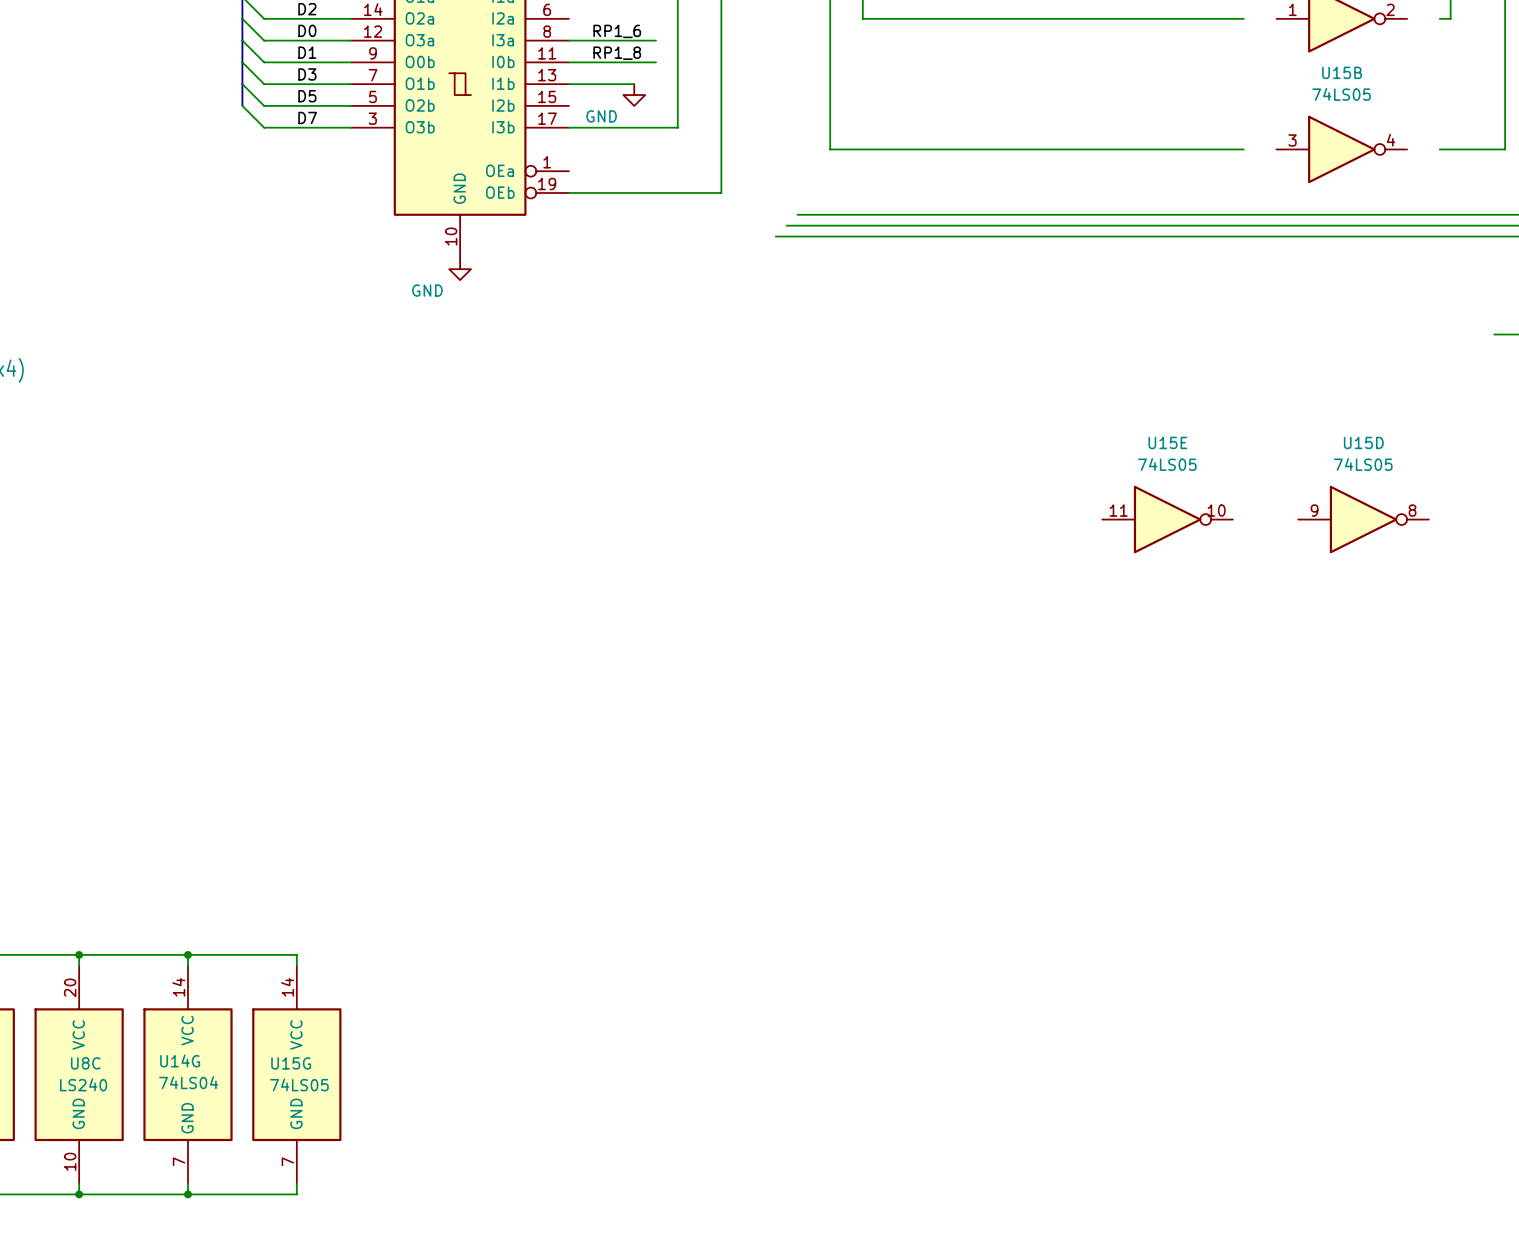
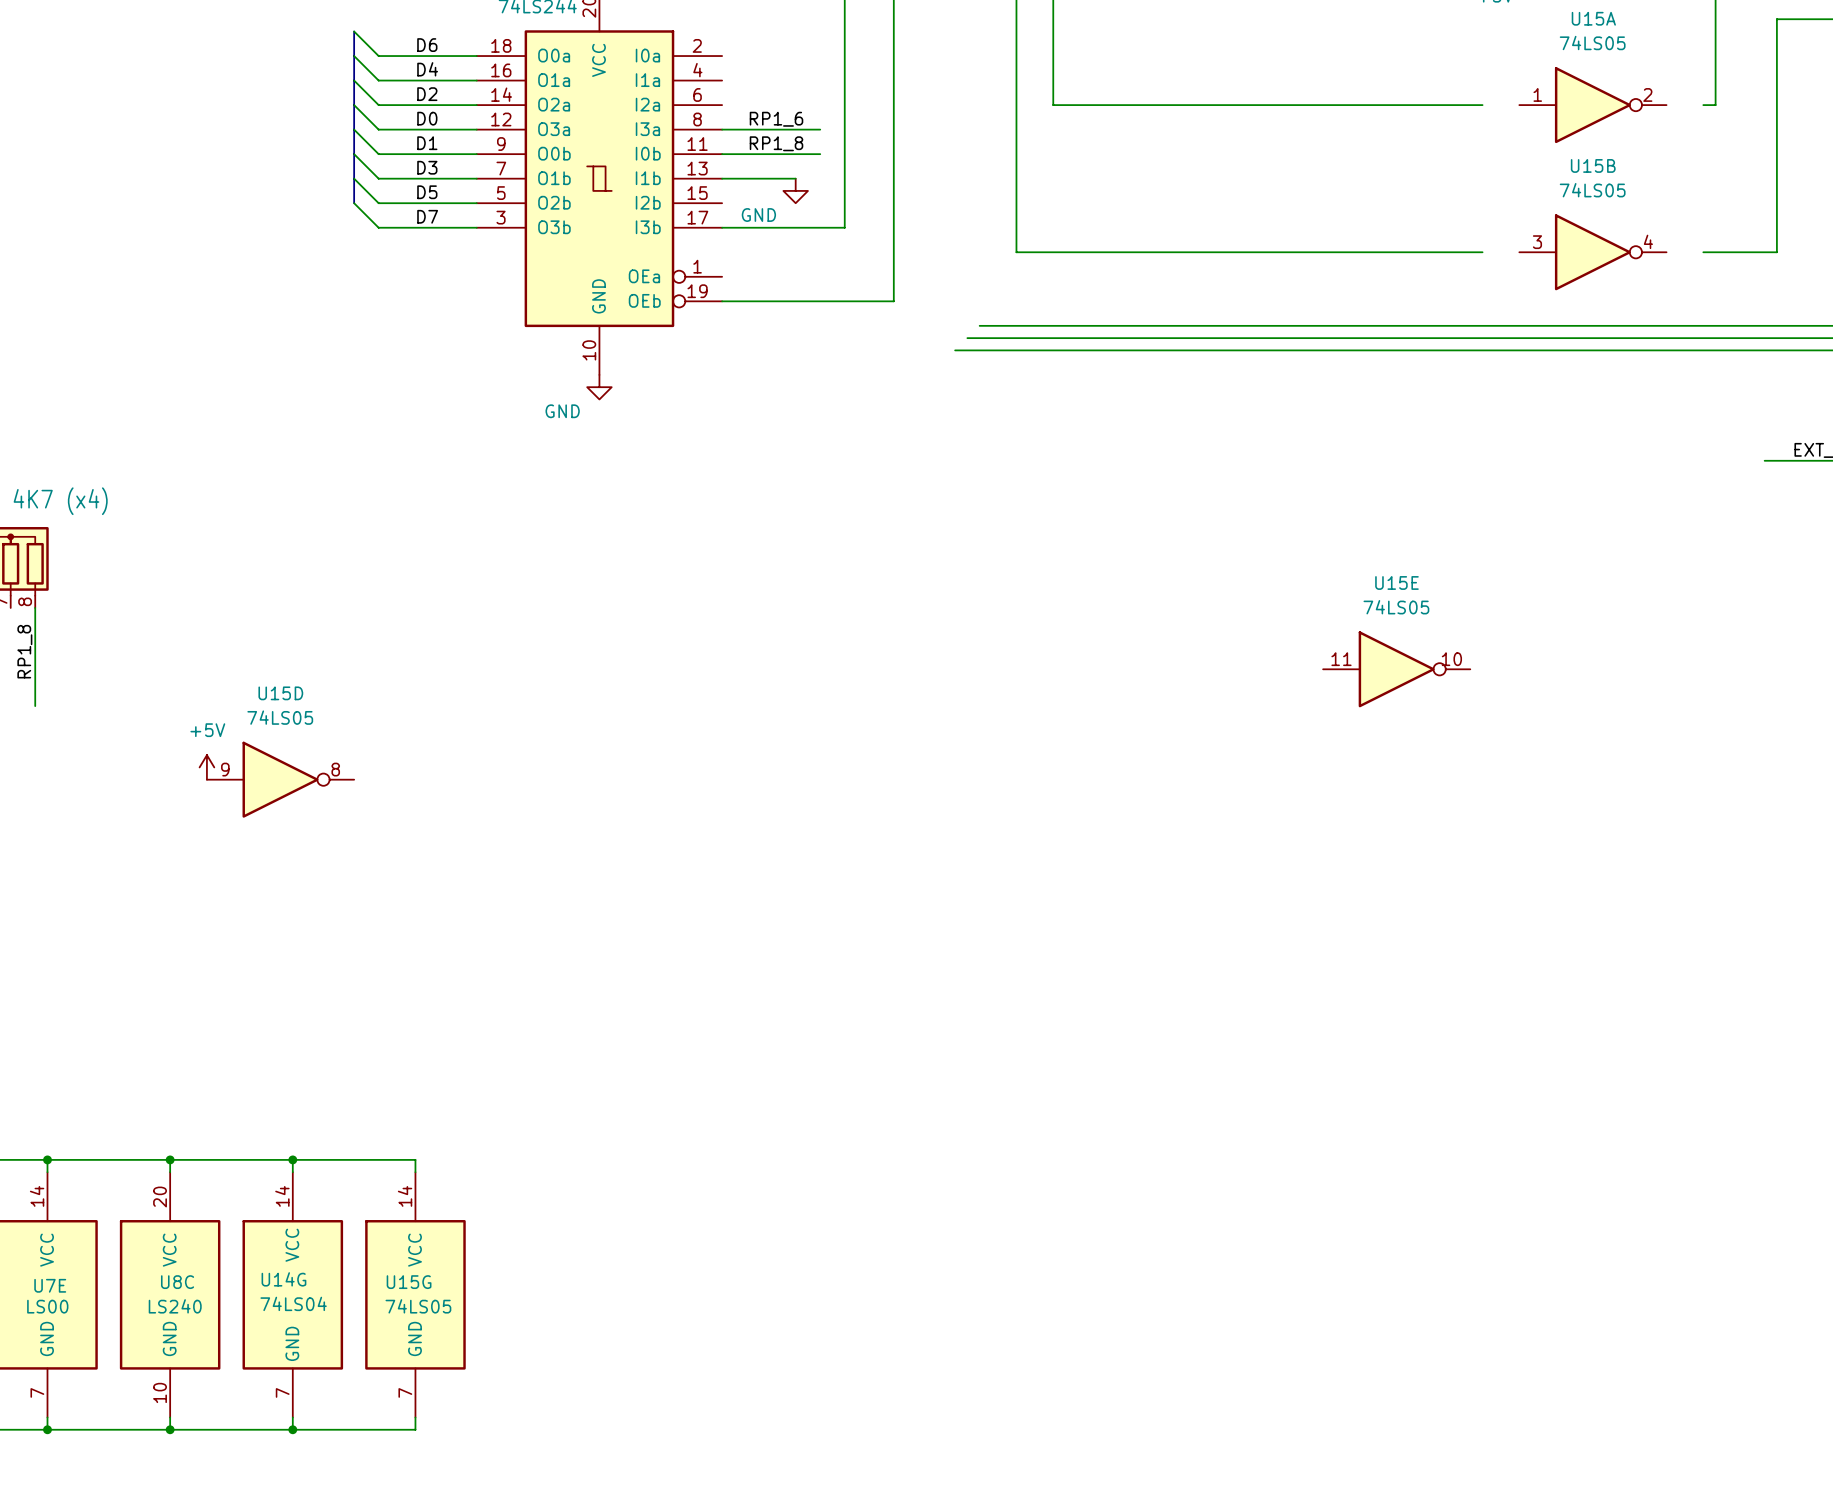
U15D position: (1363, 519) -> (280, 779)
power symbol: none -> +5V (206, 767)

